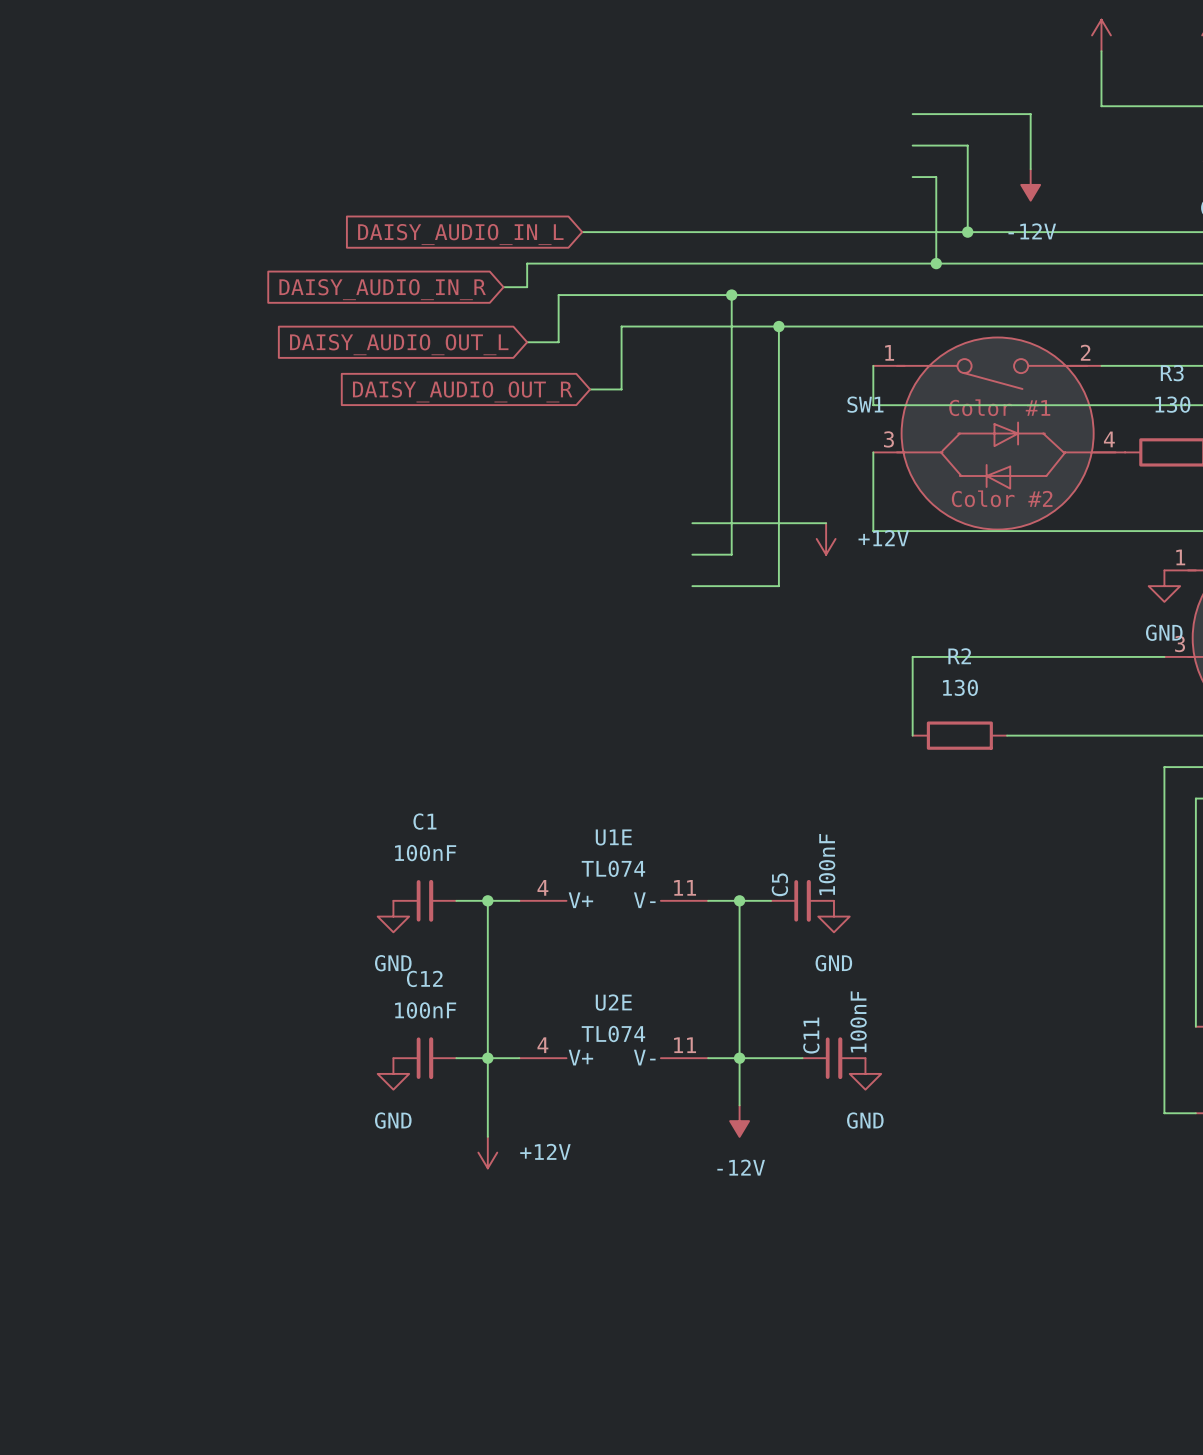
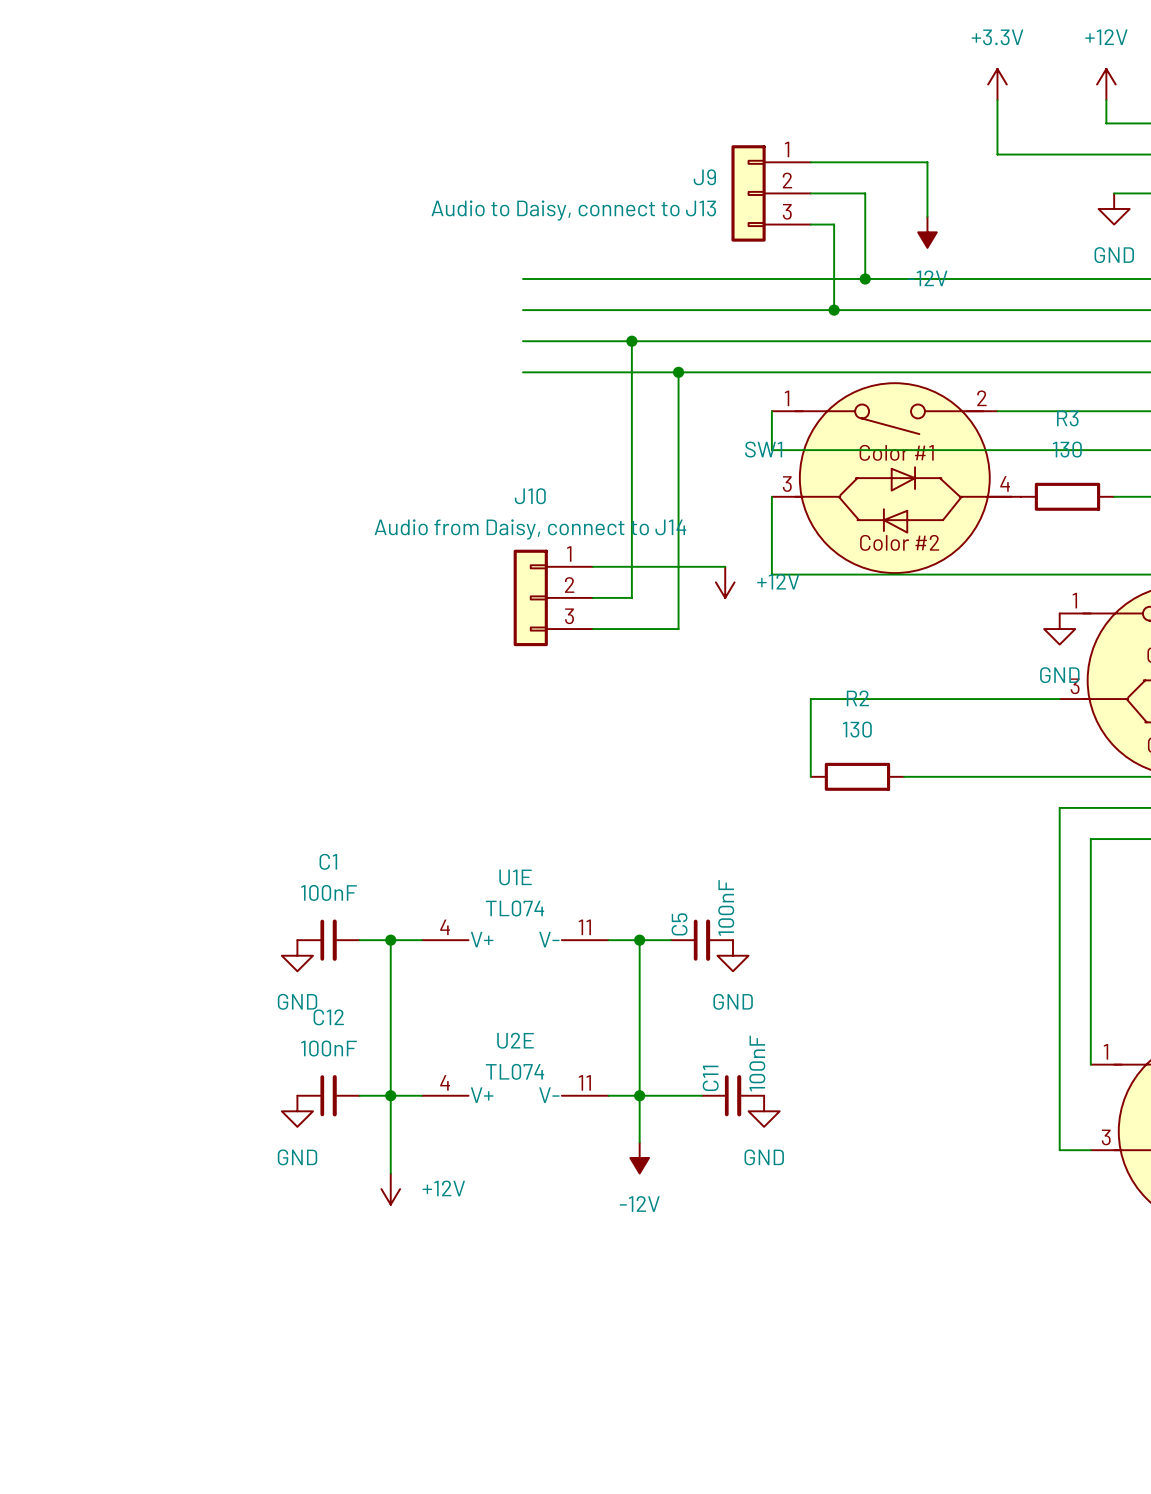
J9: none -> Audio to Daisy, connect to J13 (771, 193)
wire: (582, 232) (621, 232) -> none
global label: DAISY_AUDIO_IN_L (460, 234) -> none
wire: (621, 263) (527, 263) (527, 287) (503, 287) -> none
global label: DAISY_AUDIO_IN_R (382, 289) -> none
wire: (621, 295) (558, 295) (558, 342) (527, 342) -> none
wire: (621, 326) (621, 389) (590, 389) -> none
global label: DAISY_AUDIO_OUT_L (399, 344) -> none
global label: DAISY_AUDIO_OUT_R (462, 391) -> none
J10: none -> Audio from Daisy, connect to J14 (553, 597)

